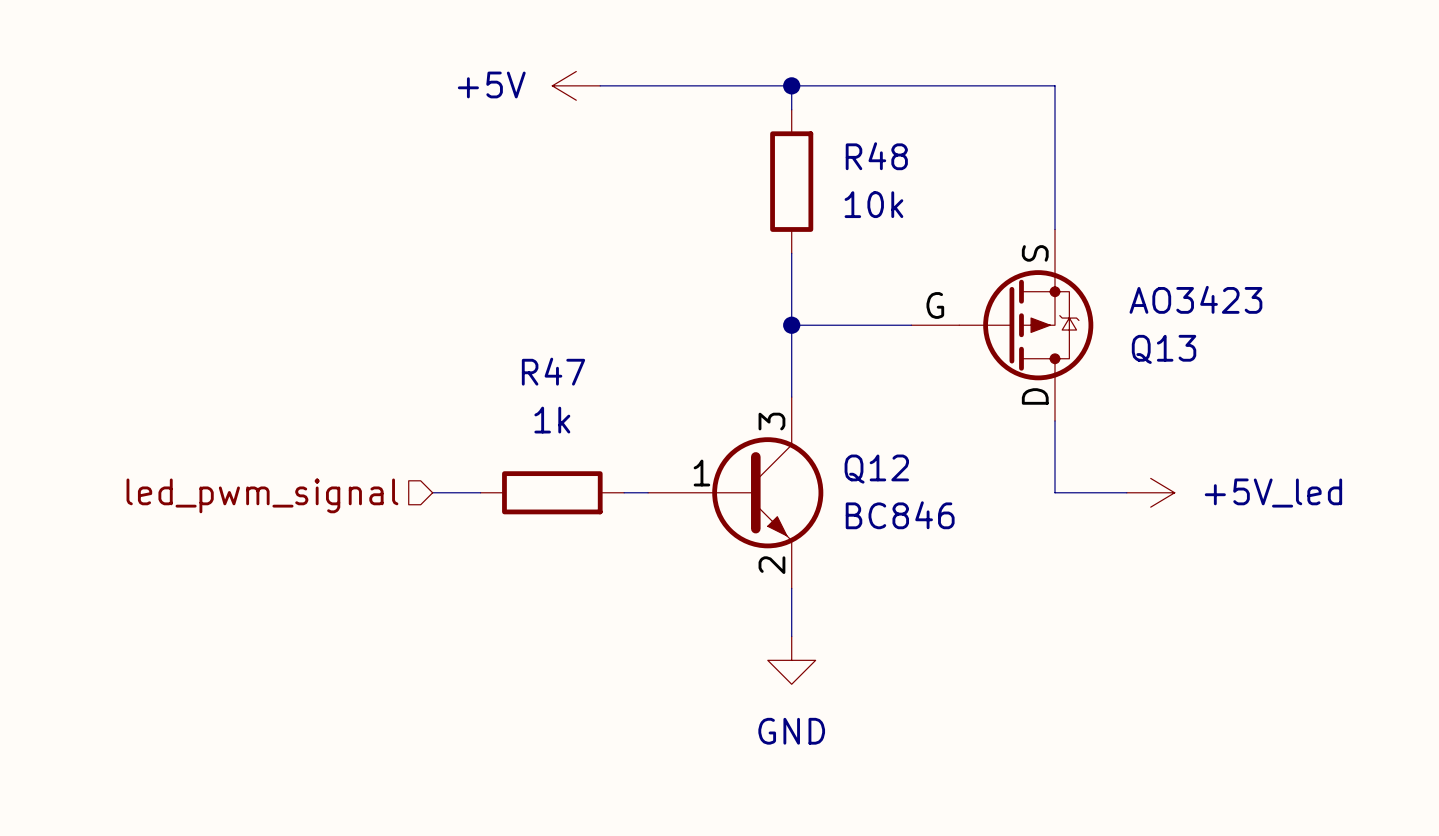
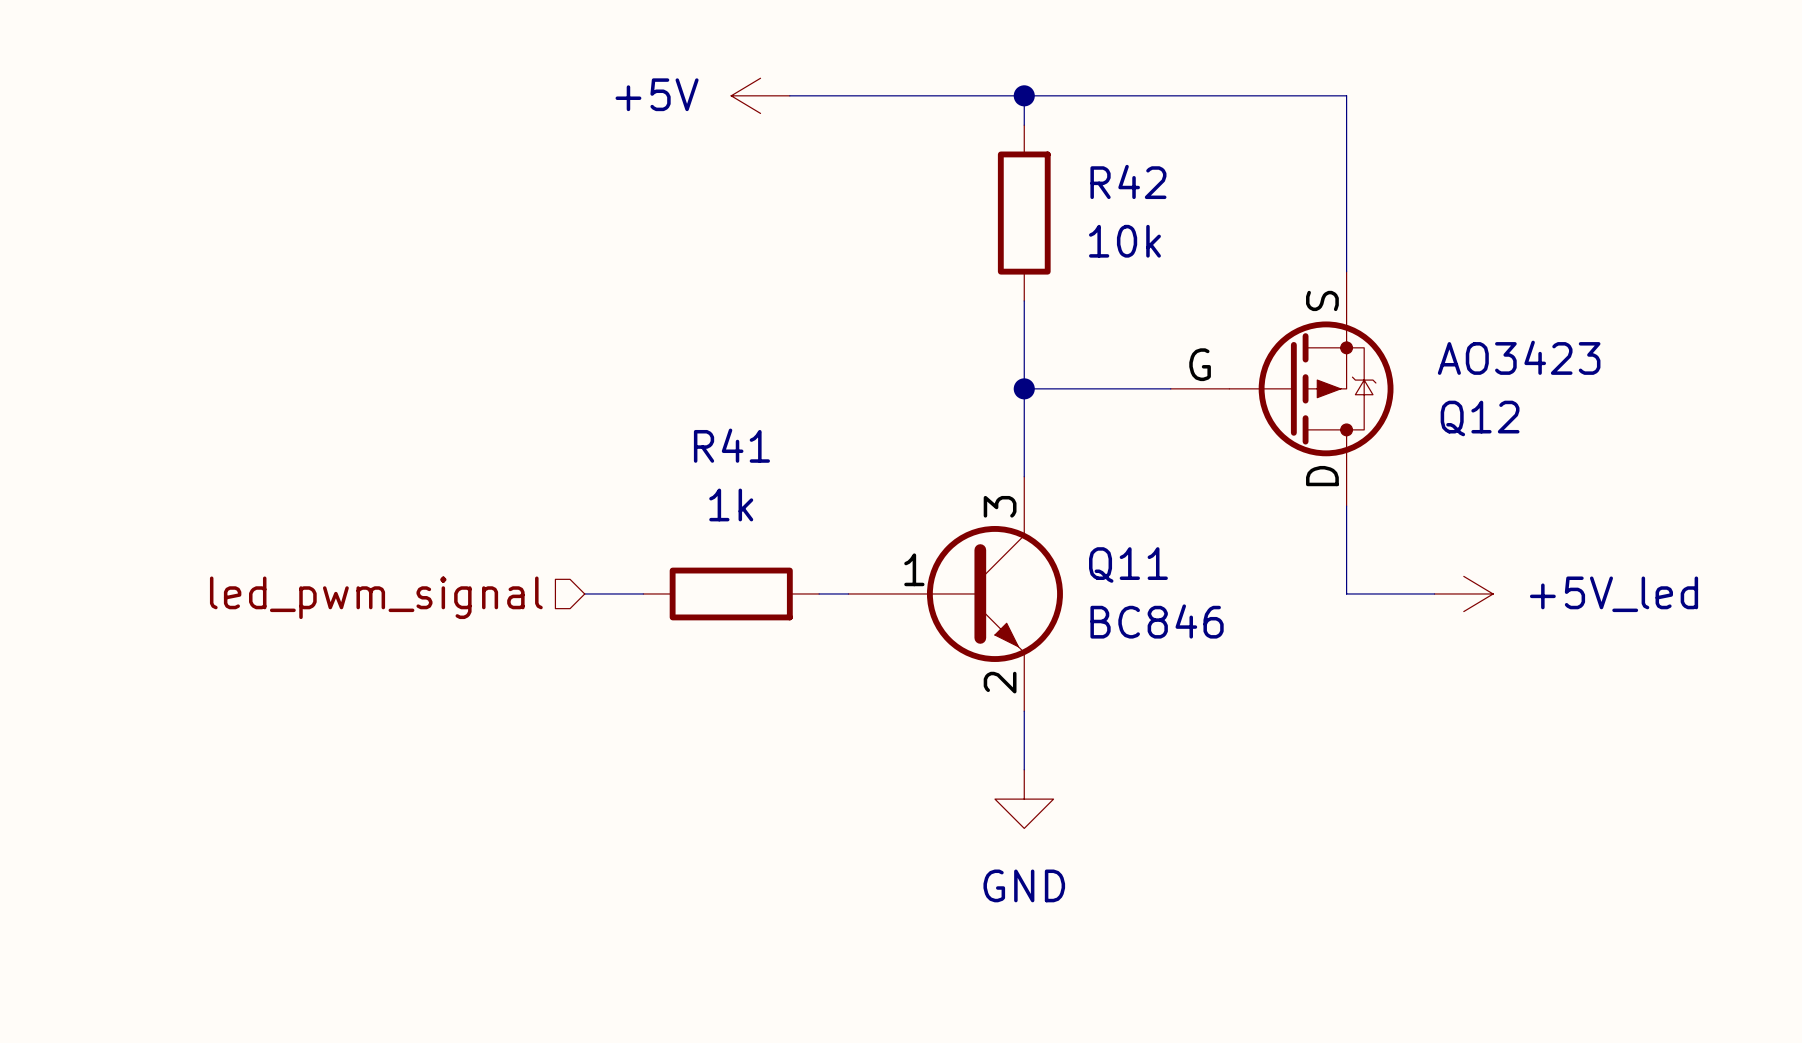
R48 name: R48 (876, 156) -> R42 (1128, 181)
Q13 name: Q13 (1164, 349) -> Q12 (1480, 418)
R47 name: R47 (553, 371) -> R41 (731, 445)
Q12 name: Q12 (876, 469) -> Q11 (1128, 564)

